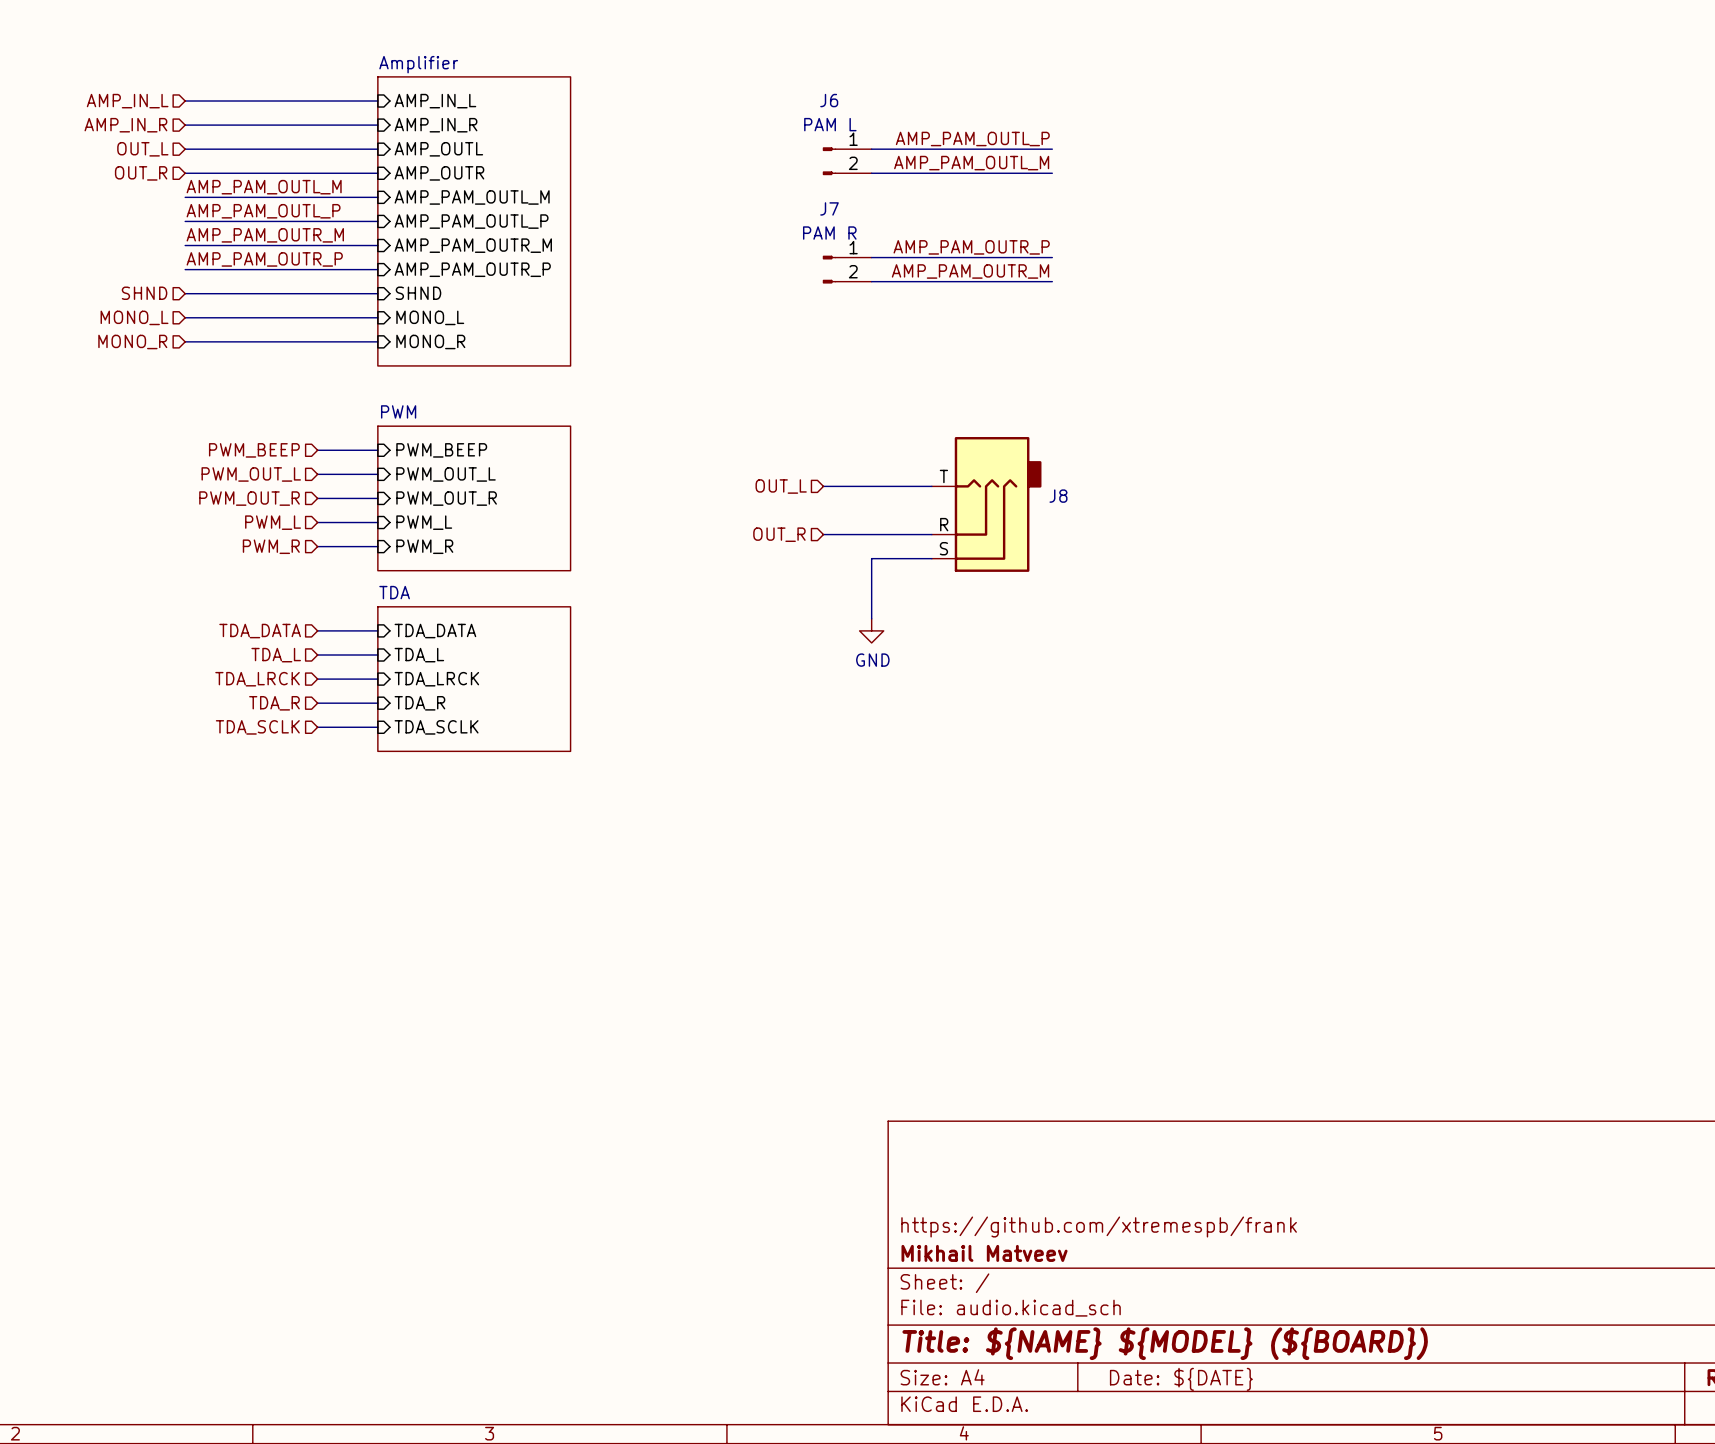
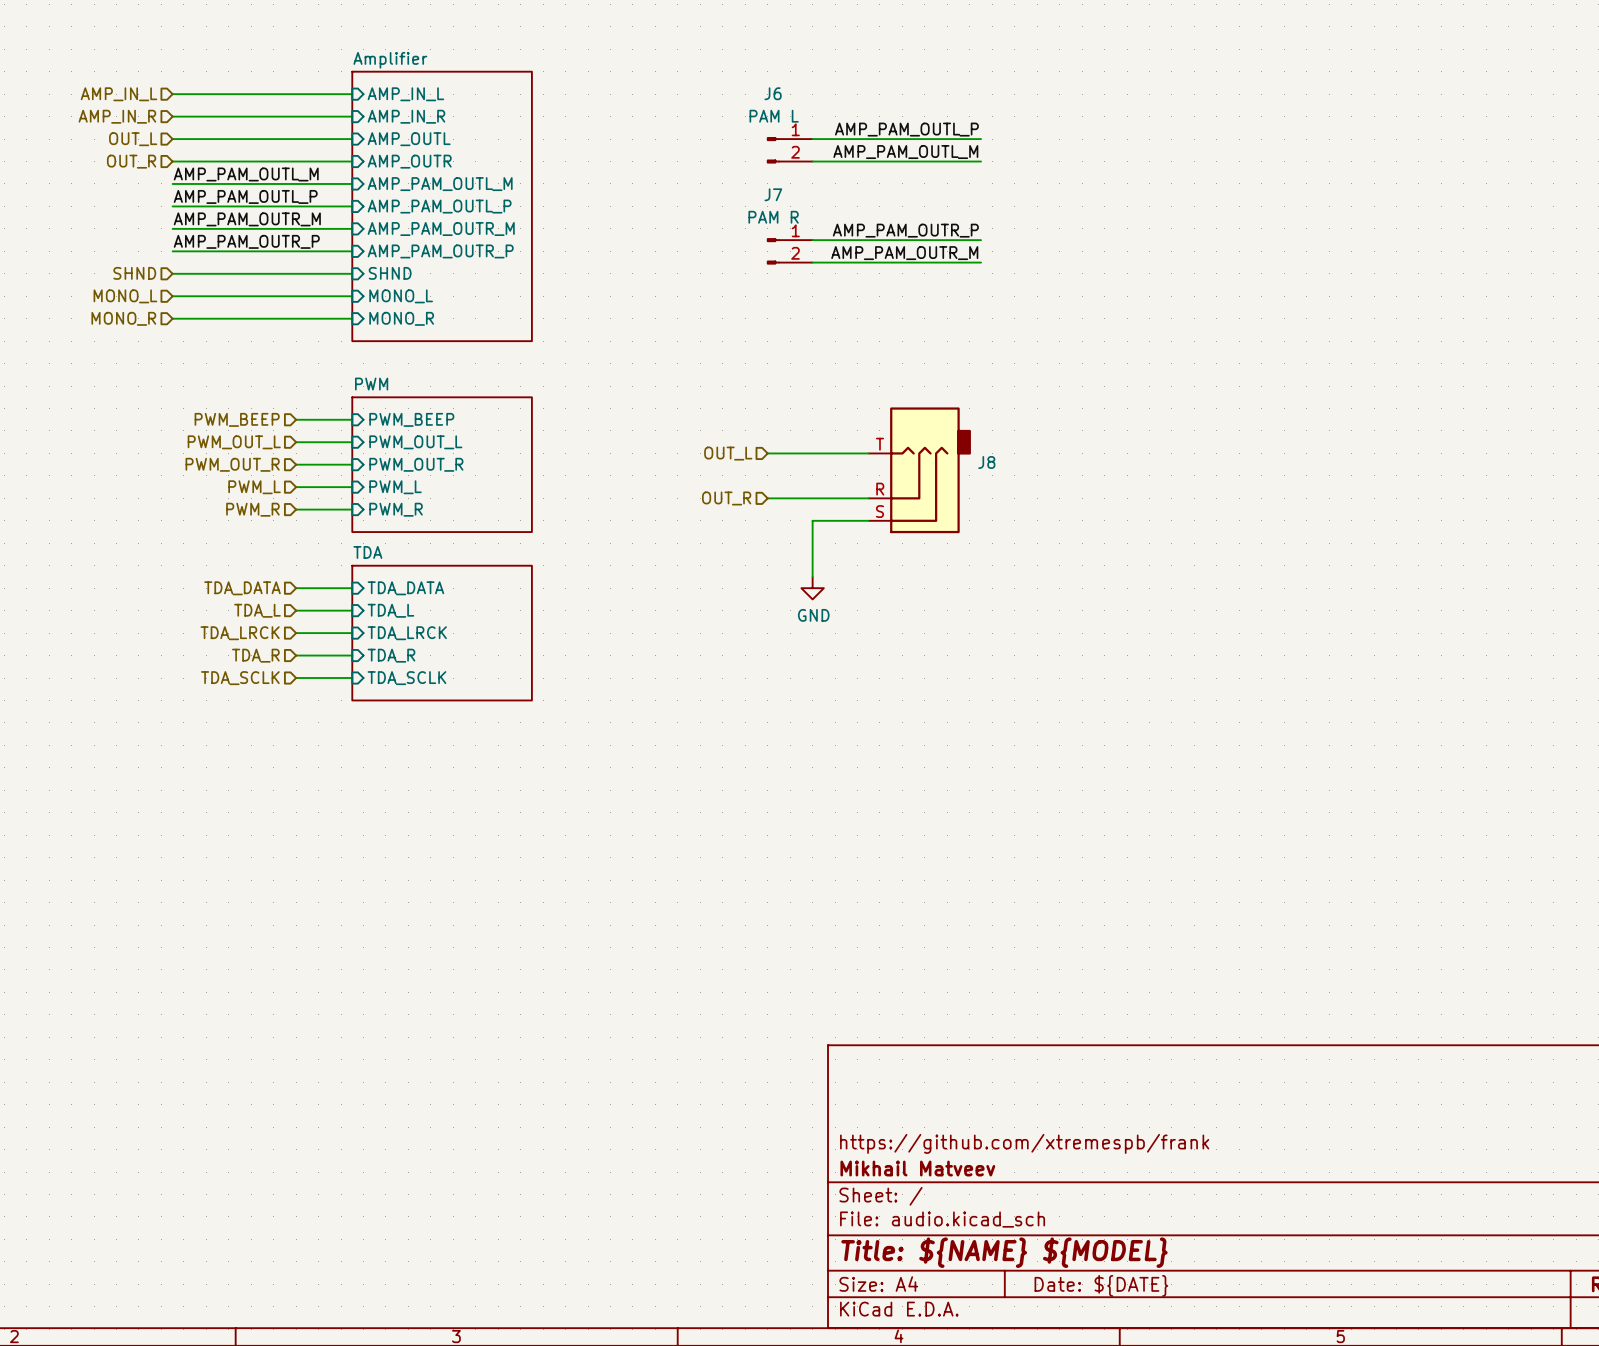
title block: Title: ${NAME} ${MODEL} (${BOARD}) (1165, 1343) -> Title: ${NAME} ${MODEL} (1004, 1252)

